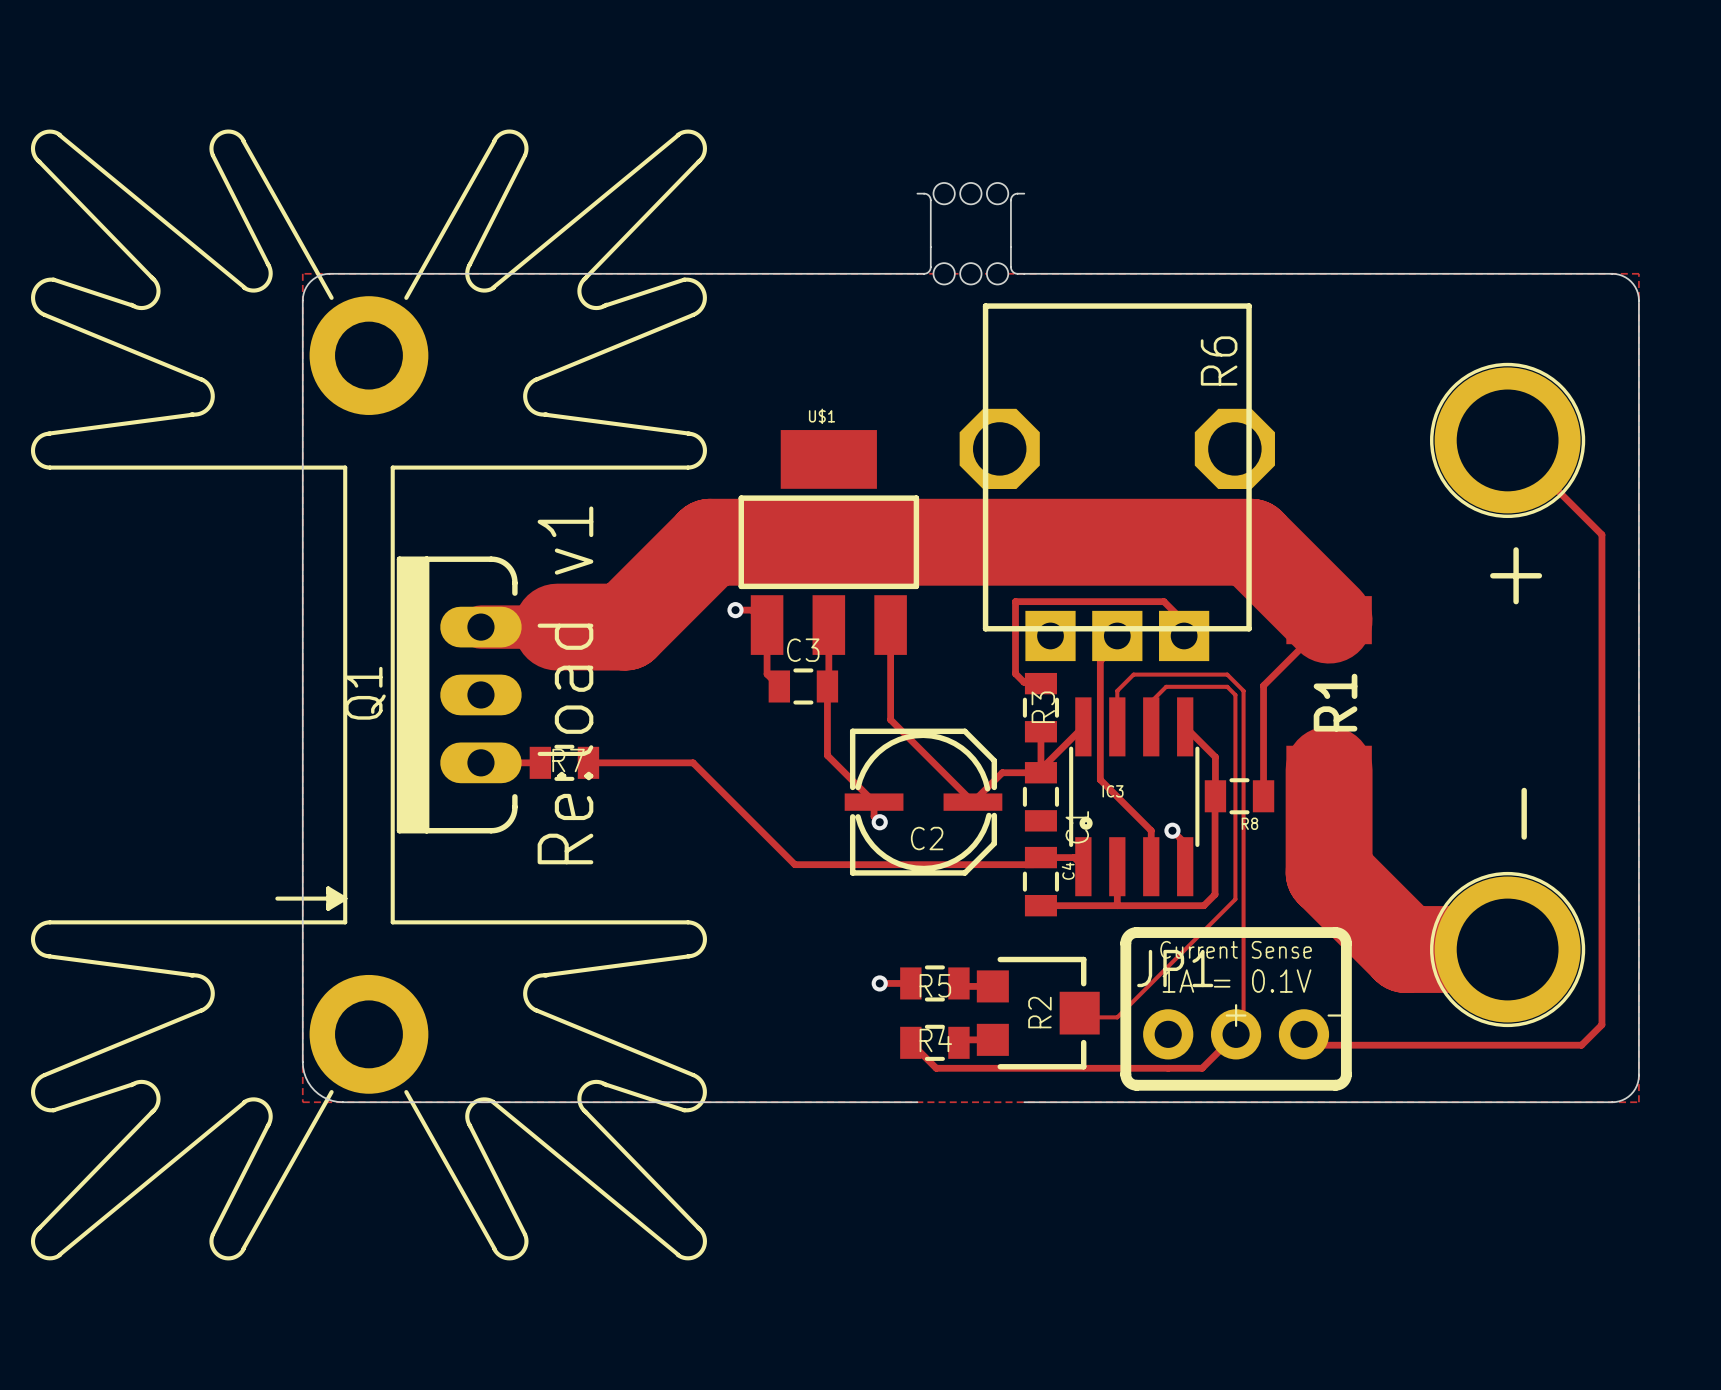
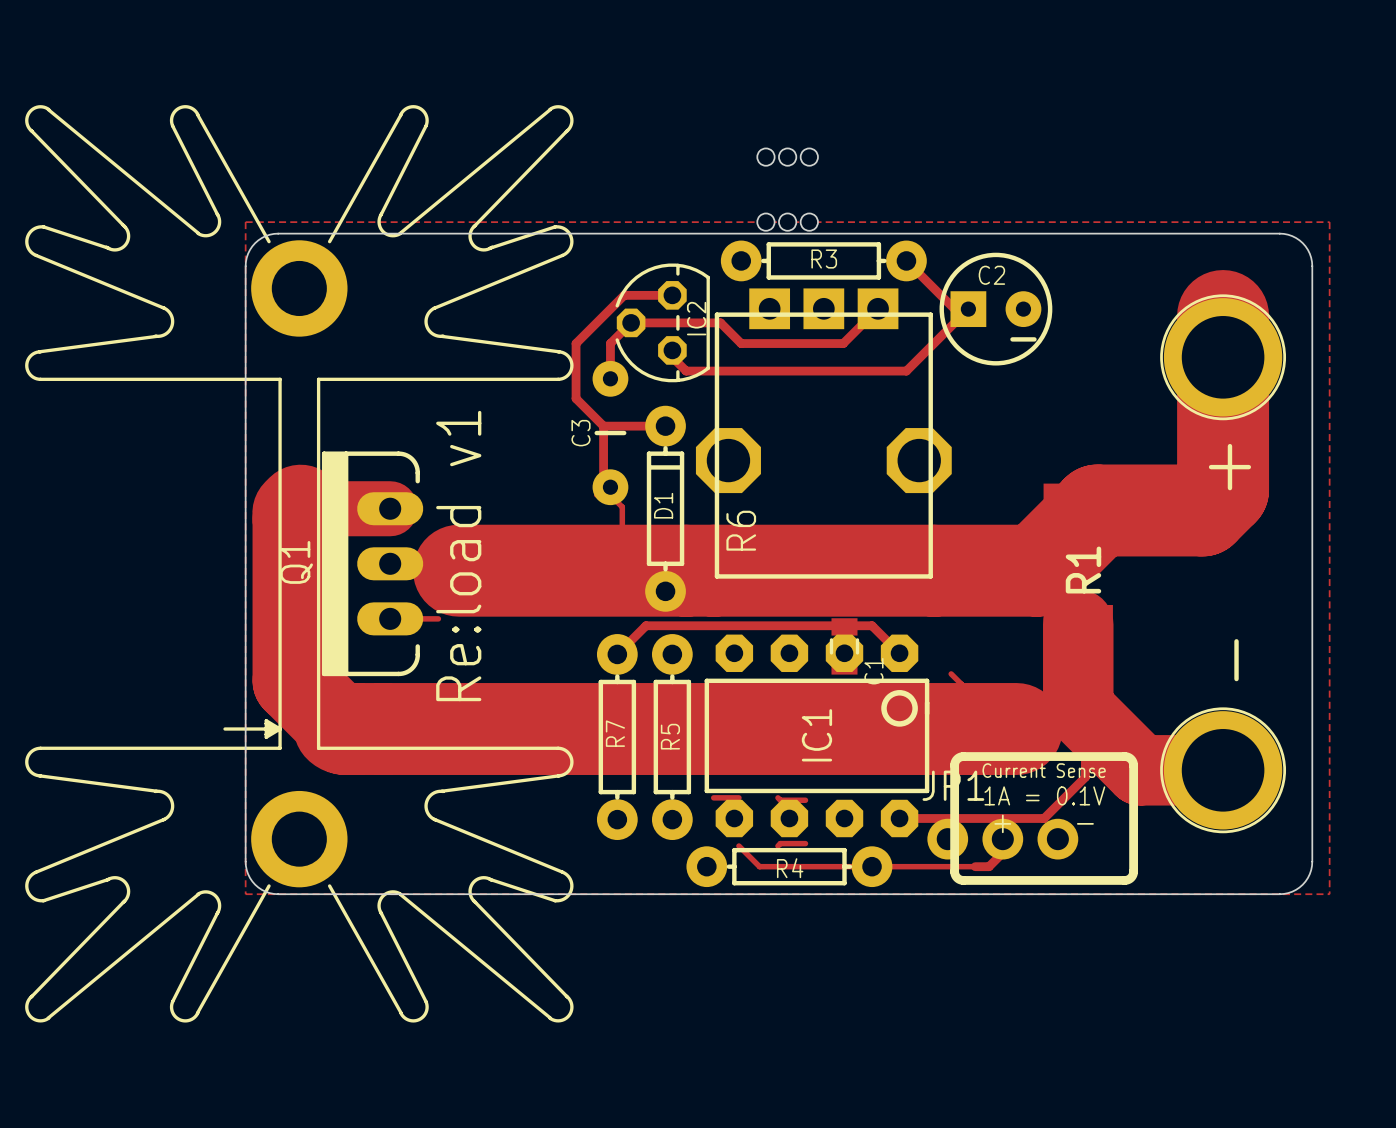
board edge: (917, 193) (926, 194) (930, 199) (930, 268) (925, 273) (326, 274) (313, 279) (304, 290) (302, 328) -> none
board edge: (1024, 193) (1015, 194) (1011, 199) (1011, 268) (1016, 273) (1612, 273) (1625, 277) (1635, 287) (1638, 300) (1638, 1078) (1633, 1091) (1622, 1100) (1612, 1102) (1577, 1102) -> (245, 266) (248, 253) (255, 243) (265, 236) (278, 233) (1279, 233) (1296, 237) (1307, 249) (1312, 266) (1312, 861) (1309, 874) (1302, 884) (1292, 891) (1279, 894)
track: none -> (906, 260) (954, 309) (968, 309) (906, 371) (686, 371) (672, 357) (672, 350)
track: none -> (672, 295) (624, 295) (576, 343) (576, 398) (603, 426)
track: none -> (878, 308) (843, 343) (741, 343) (720, 322) (631, 322) (610, 343) (610, 378)
track: none -> (1223, 316) (1223, 489) (1202, 510) (1097, 510) (1037, 570) (459, 570)
IC2: none -> (662, 322)
track: (1507, 440) (1601, 534) (1601, 1024) (1581, 1045) (1314, 1045) (1303, 1034) -> none
R6 rotation: 0° (1117, 482) -> 180° (823, 433)
track: none -> (603, 426) (603, 480) (610, 487)
track: none -> (603, 426) (665, 426)
U$1: (828, 542) -> none
via: (735, 610) -> none
track: (828, 625) (827, 755) (874, 802) (874, 816) (879, 822) -> none
track: (890, 625) (890, 719) (972, 802) (1002, 772) (1040, 772) (1040, 731) -> none
track: (480, 627) (625, 627) (710, 542) (1251, 542) (1329, 620) (1263, 685) (1263, 796) -> (390, 508) (300, 508) (294, 516) (293, 680) (342, 728) (1016, 729)
D1: none -> (665, 508)
track: (1117, 635) (1117, 644) (1100, 661) (1100, 779) (1151, 830) (1151, 866) -> none
track: (1184, 635) (1184, 621) (1163, 601) (1015, 601) (1015, 673) (1023, 682) (1040, 683) -> none
C3 footprint: [768, 668, 839, 705] -> [592, 360, 629, 506]
R3 footprint: [1022, 672, 1060, 743] -> [720, 240, 927, 282]
track: (1083, 726) (1040, 769) -> none
track: (1117, 726) (1117, 690) (1133, 674) (1227, 674) (1243, 690) (1243, 1026) (1202, 1068) -> (1002, 852) (989, 866) (975, 866)
track: (1151, 726) (1151, 701) (1166, 686) (1227, 686) (1235, 694) (1235, 899) (1117, 1017) (1083, 1017) (1079, 1013) -> none
track: (1185, 726) (1215, 757) (1215, 894) (1203, 905) (1040, 905) -> none
C2 footprint: [844, 728, 1003, 876] -> [939, 252, 1053, 366]
R7 footprint: [529, 744, 600, 781] -> [596, 634, 638, 841]
track: (588, 762) (693, 762) (794, 864) (1033, 864) (1040, 857) (1074, 857) (1083, 866) -> none
IC3: (1134, 796) -> none
R8: (1239, 796) -> none
track: none -> (899, 653) (872, 625) (646, 625) (617, 654)
via: (879, 822) -> none
via: (1172, 830) -> none
C2 name position: C2 (927, 838) -> C2 (991, 275)
C4: (1040, 881) -> none
track: none -> (1085, 729) (1085, 777) (1044, 818) (899, 818)
IC1: none -> (816, 735)
line: (1187, 932) (1135, 932) (1128, 935) (1125, 943) (1126, 1078) (1135, 1085) (1187, 1085) -> (963, 756) (957, 759) (954, 765) (954, 872) (957, 877) (963, 880)
line: (1335, 932) (1343, 935) (1346, 943) (1346, 1075) (1343, 1082) (1335, 1085) -> (1083, 756) (1125, 756) (1131, 759) (1133, 765) (1132, 875) (1125, 880) (1083, 880)
text position: Current Sense (1236, 949) -> Current Sense (1044, 770)
R5 footprint: [900, 965, 970, 1002] -> [651, 634, 693, 841]
text position: 1A = 0.1V (1237, 981) -> 1A = 0.1V (1044, 795)
via: (879, 983) -> none
R2: (1038, 1013) -> none
R4 footprint: [900, 1024, 970, 1061] -> [686, 846, 893, 888]
board edge: none -> (744, 894) (831, 894)

